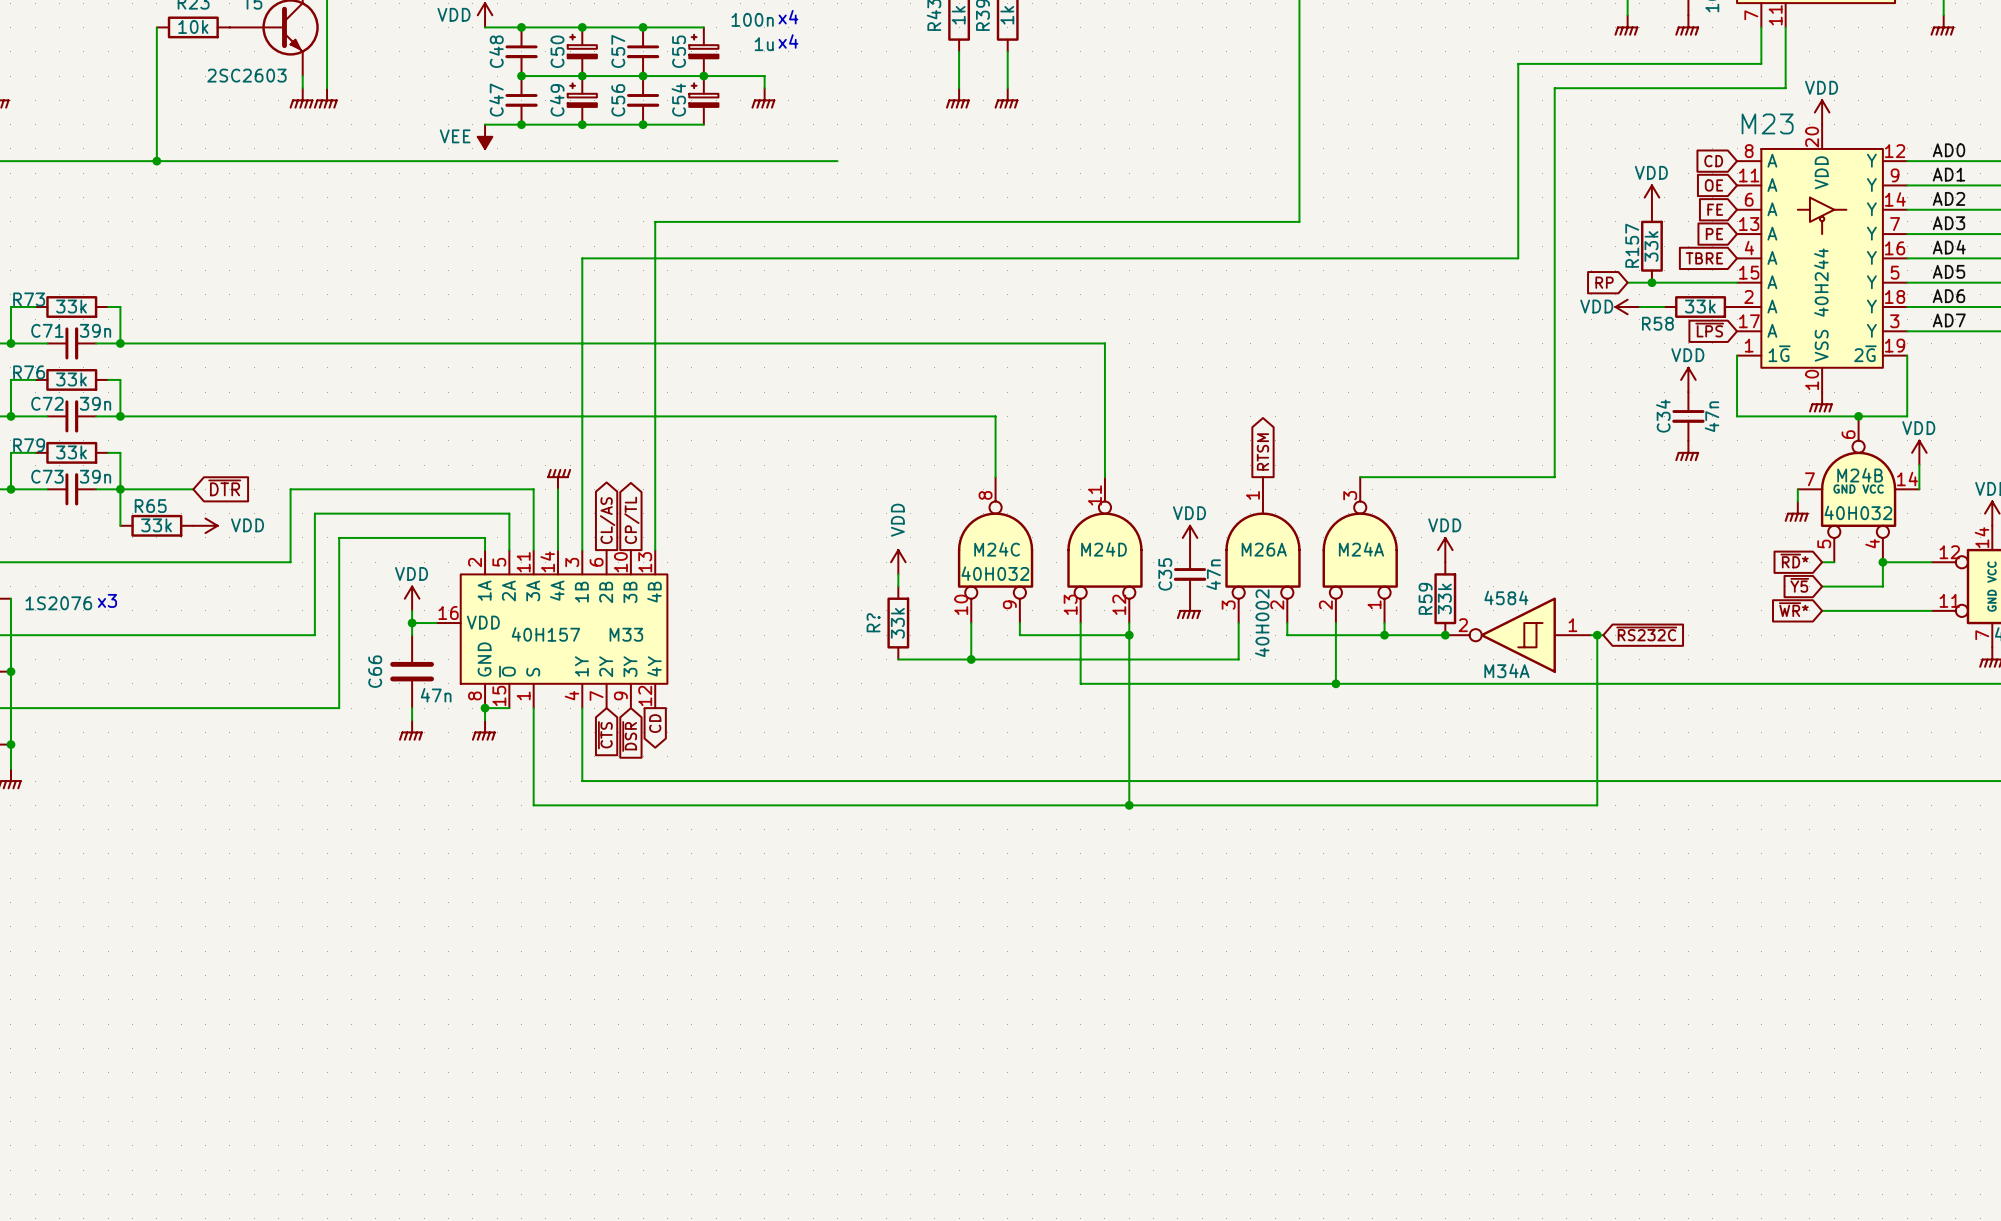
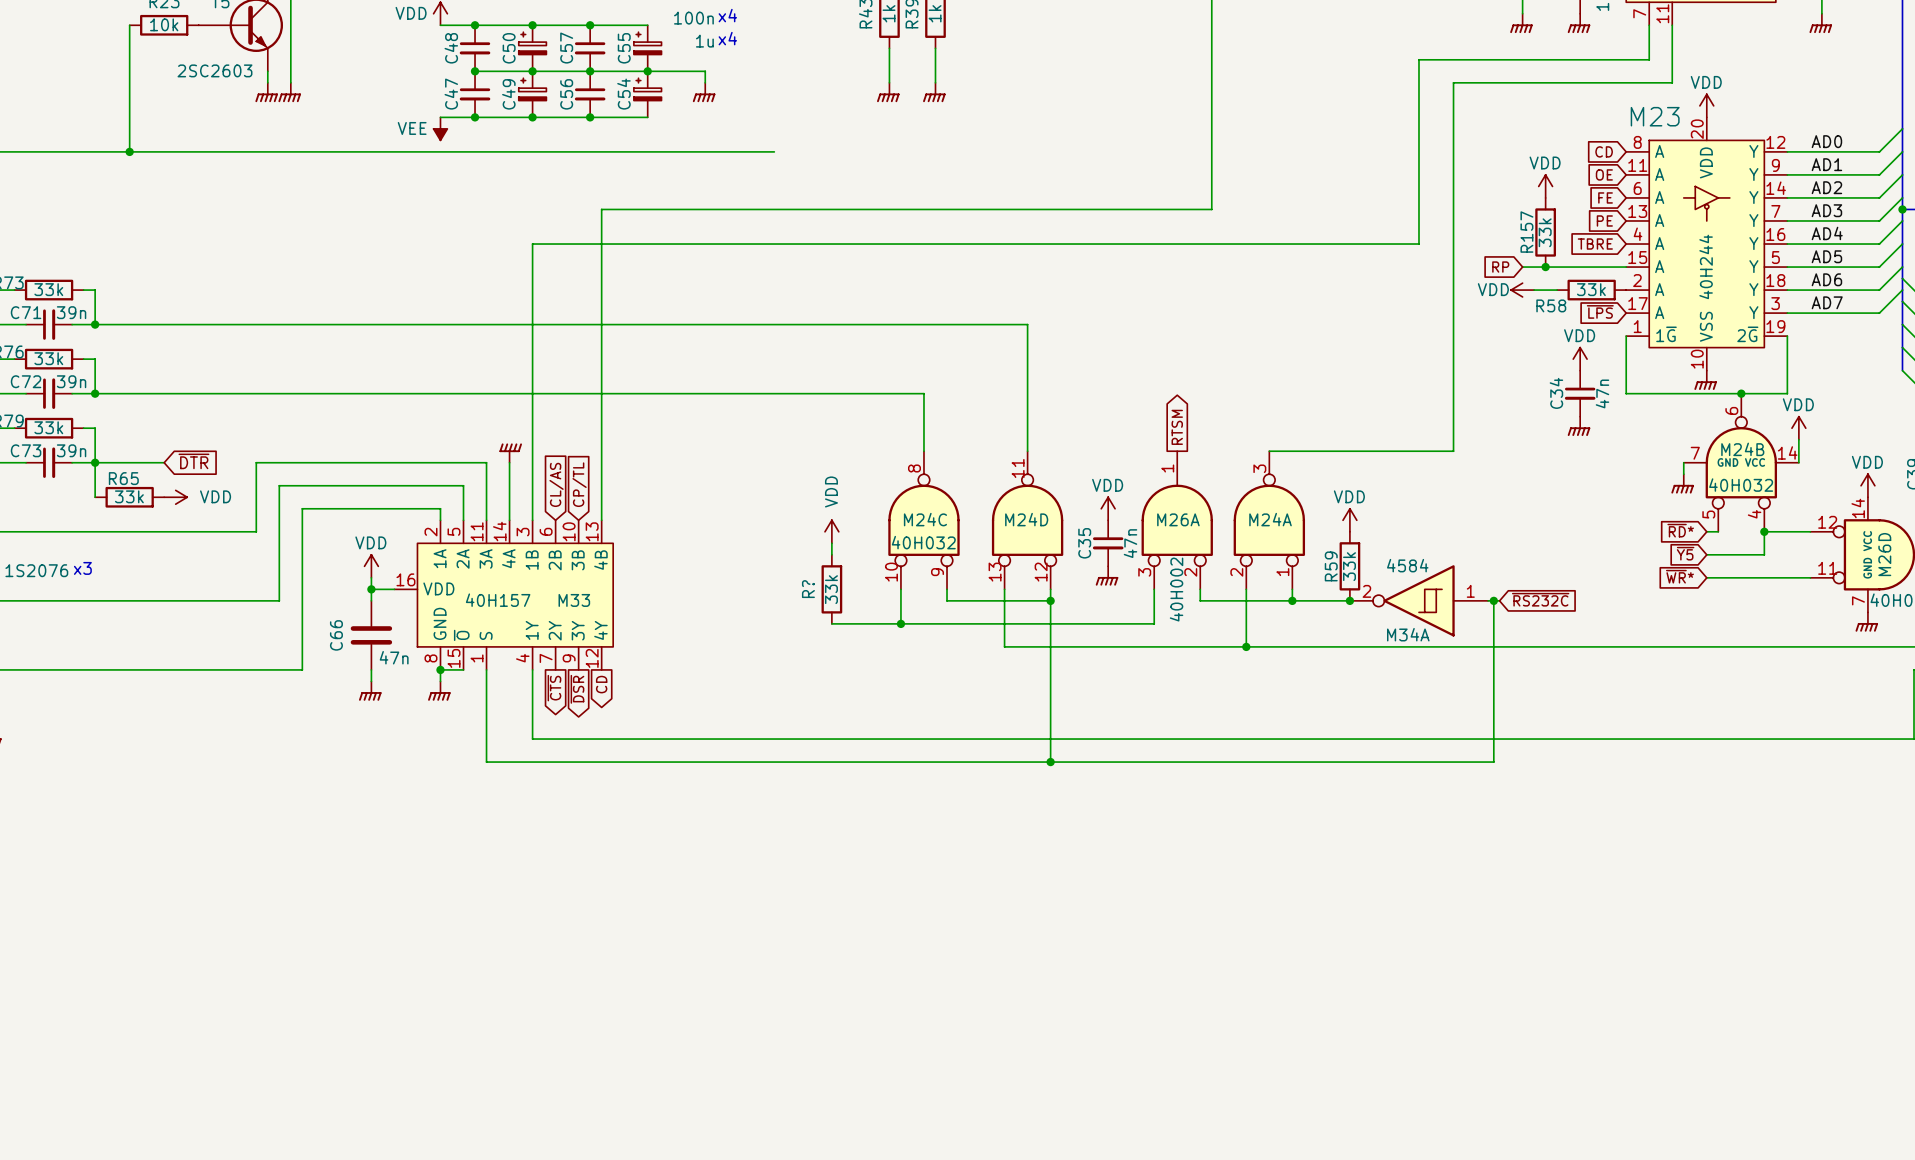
global label shape: output (607, 520) -> input (556, 484)
global label shape: output (631, 520) -> input (579, 484)
global label shape: input (605, 735) -> output (554, 688)
global label shape: input (629, 736) -> output (577, 689)

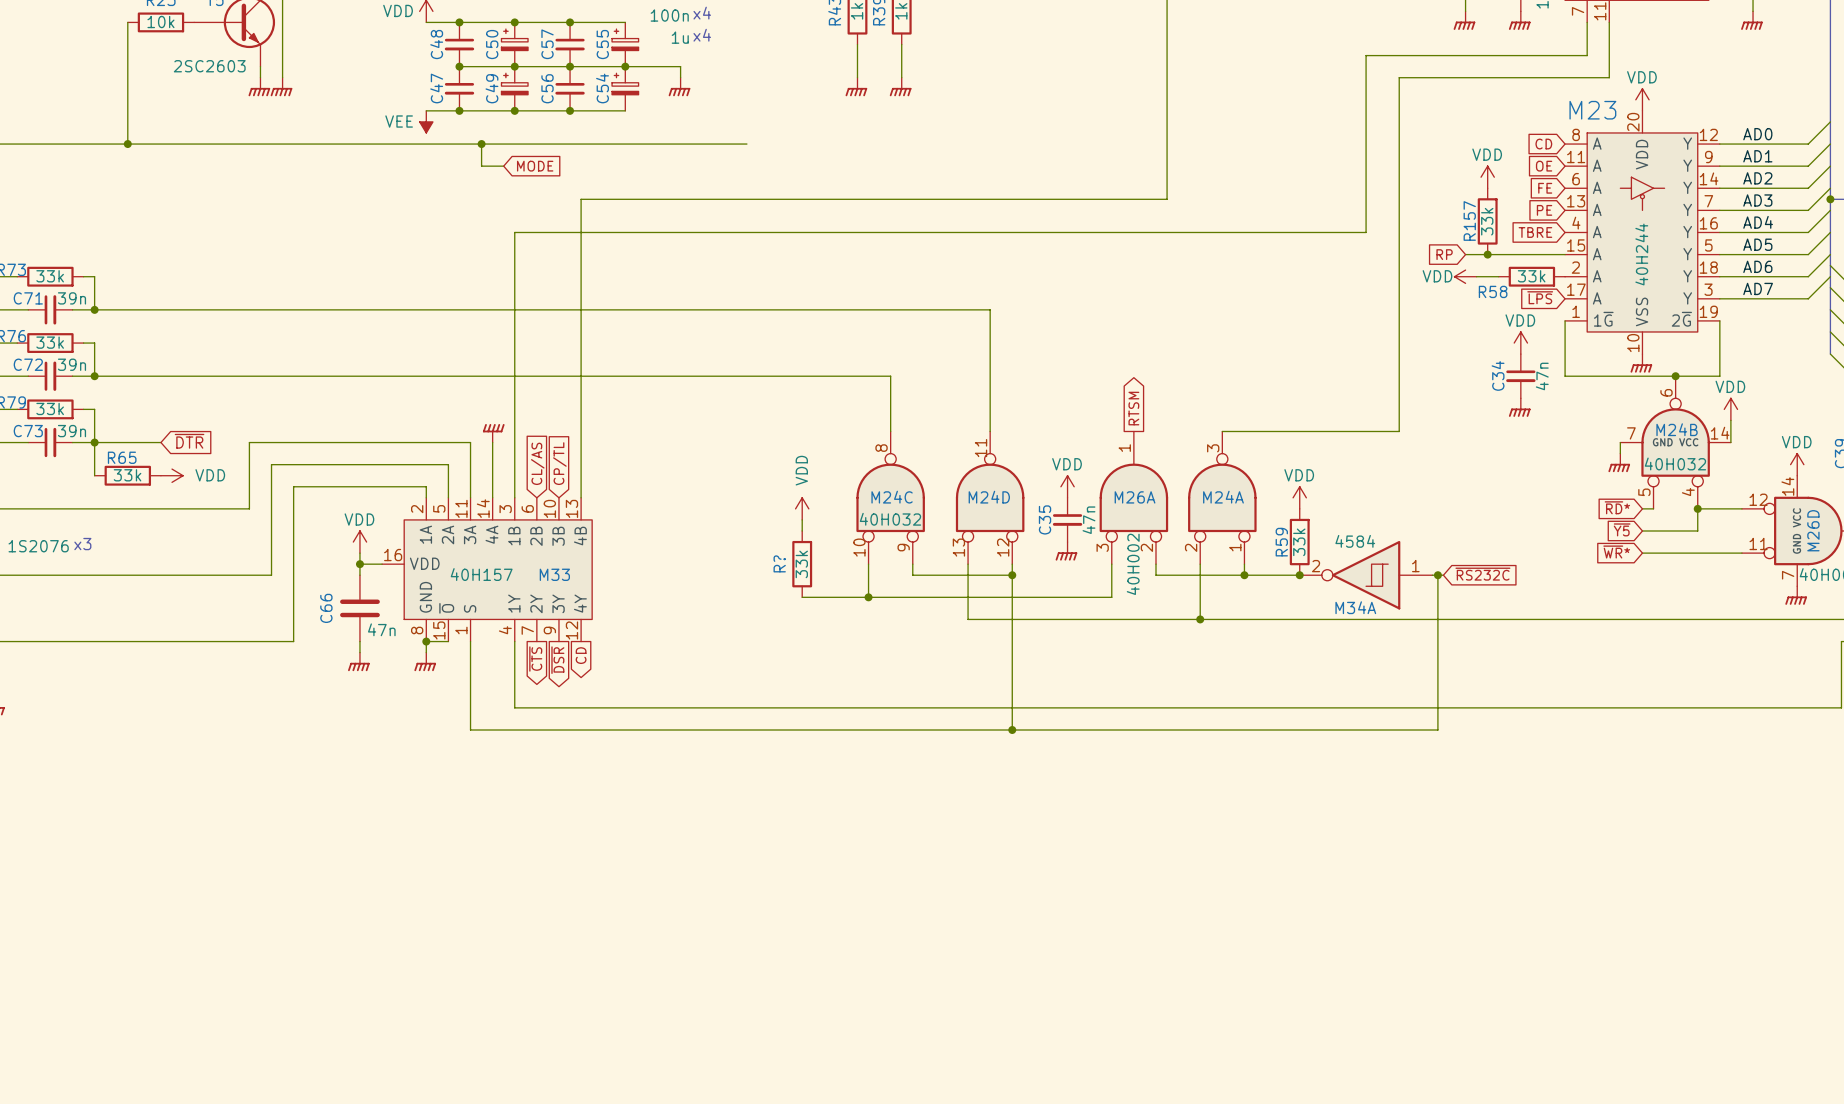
wire: none -> (481, 144) (481, 166) (503, 166)
junction: none -> (481, 144)
global label: none -> MODE (535, 166)

